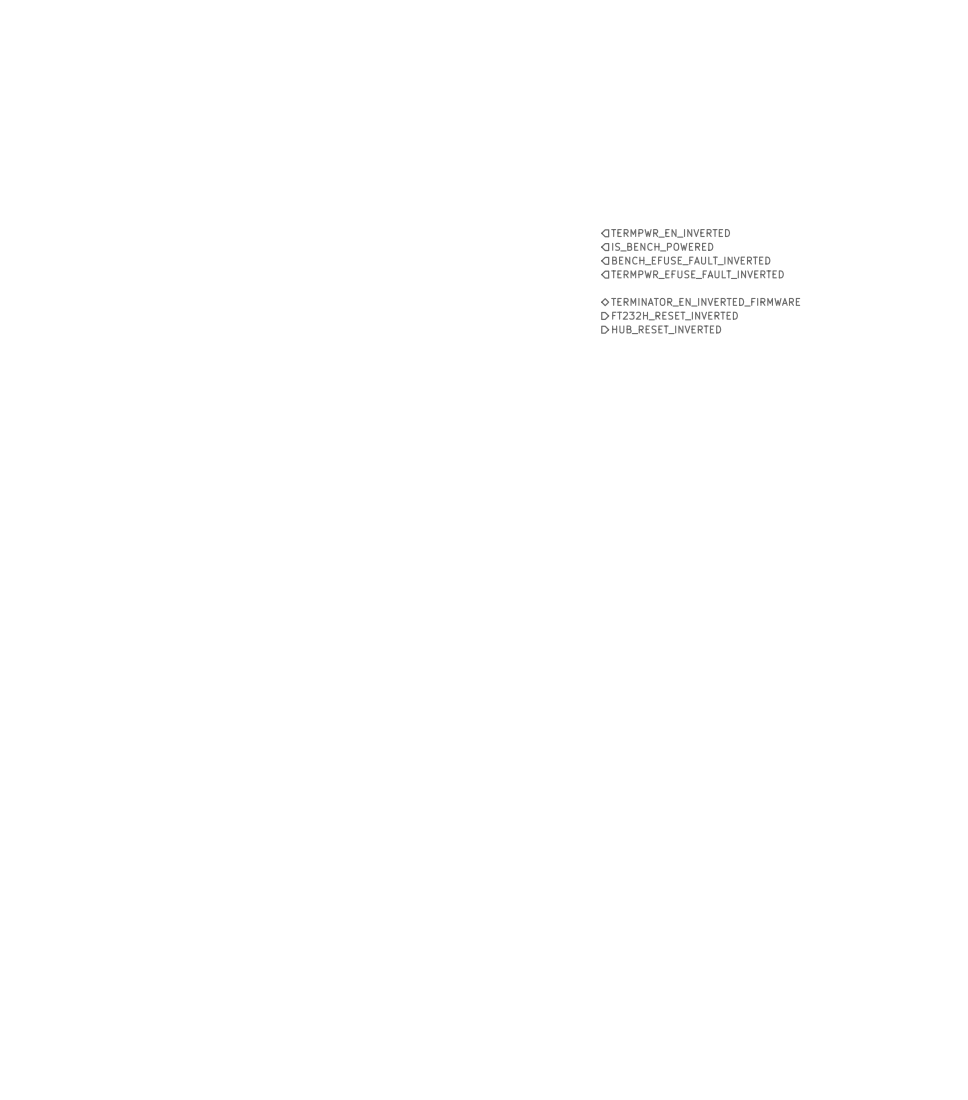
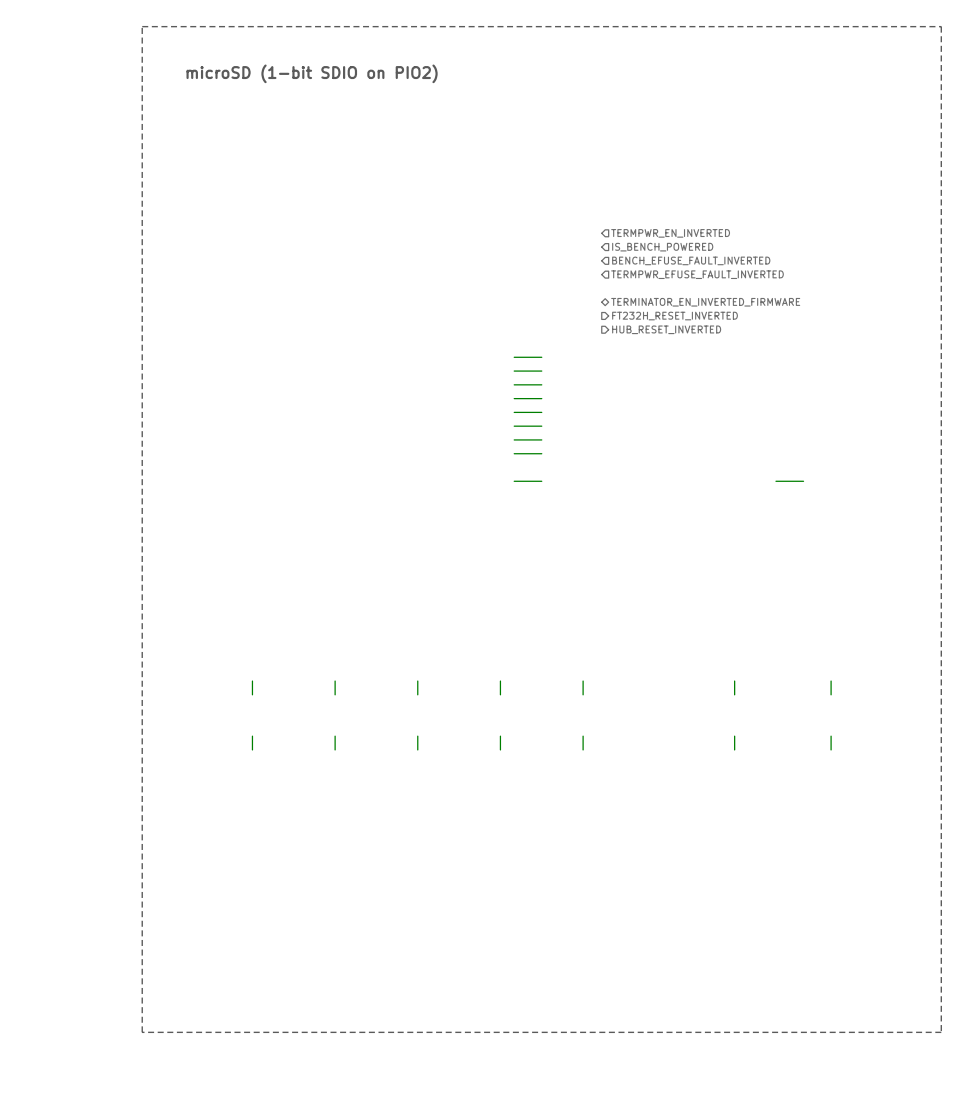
line: none -> (142, 26) (941, 26) (941, 1032) (142, 1032) (142, 26)
text: none -> microSD (1-bit SDIO on PIO2) (312, 73)
wire: none -> (514, 357) (541, 357)
wire: none -> (514, 371) (541, 371)
wire: none -> (514, 384) (541, 384)
wire: none -> (514, 398) (541, 398)
wire: none -> (514, 412) (541, 412)
wire: none -> (514, 426) (541, 426)
wire: none -> (514, 439) (541, 439)
wire: none -> (514, 453) (541, 453)
wire: none -> (514, 481) (541, 481)
wire: none -> (775, 481) (803, 481)
wire: none -> (252, 681) (252, 694)
wire: none -> (335, 681) (335, 694)
wire: none -> (417, 681) (417, 694)
wire: none -> (500, 681) (500, 694)
wire: none -> (583, 681) (583, 694)
wire: none -> (734, 681) (734, 694)
wire: none -> (831, 681) (831, 694)
wire: none -> (252, 736) (252, 749)
wire: none -> (335, 736) (335, 749)
wire: none -> (417, 736) (417, 749)
wire: none -> (500, 736) (500, 749)
wire: none -> (583, 736) (583, 749)
wire: none -> (734, 736) (734, 749)
wire: none -> (831, 736) (831, 749)

